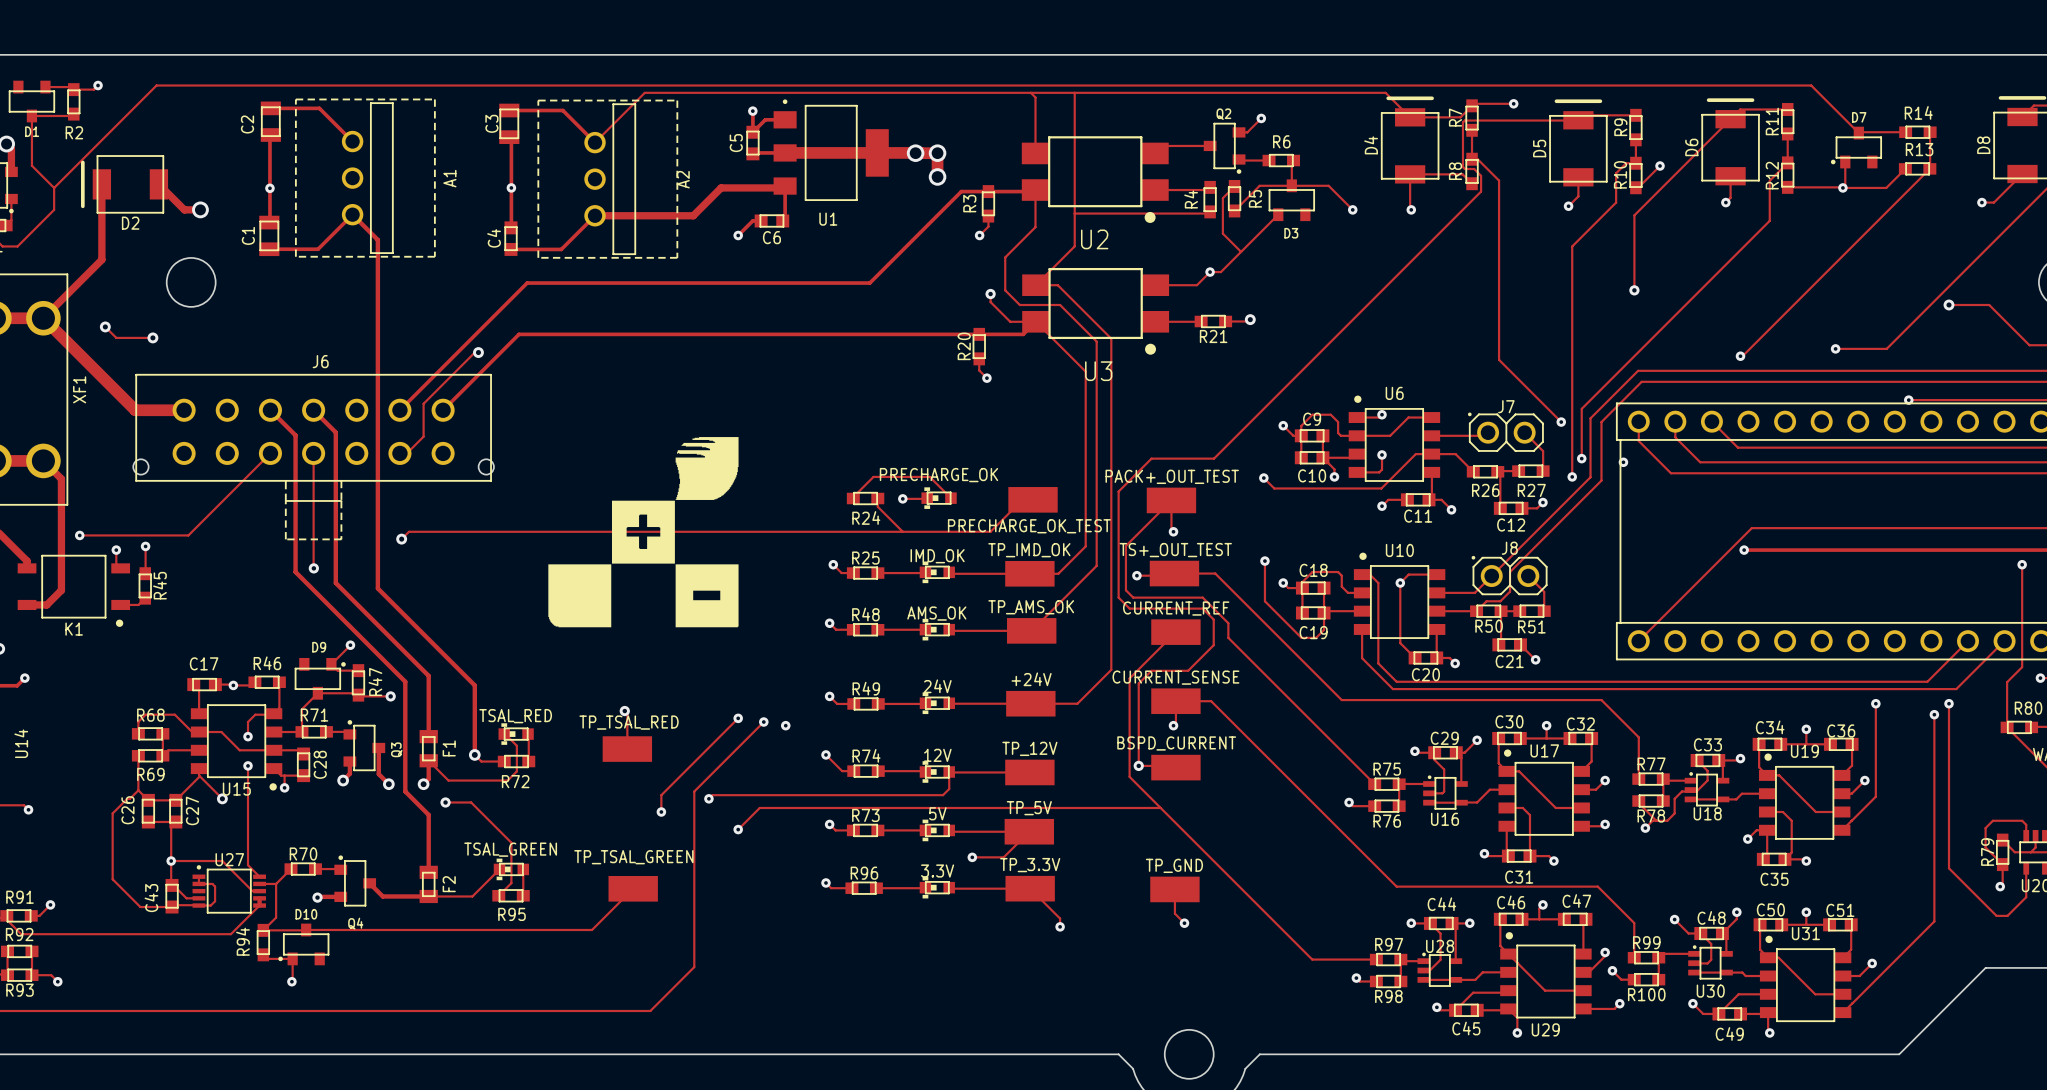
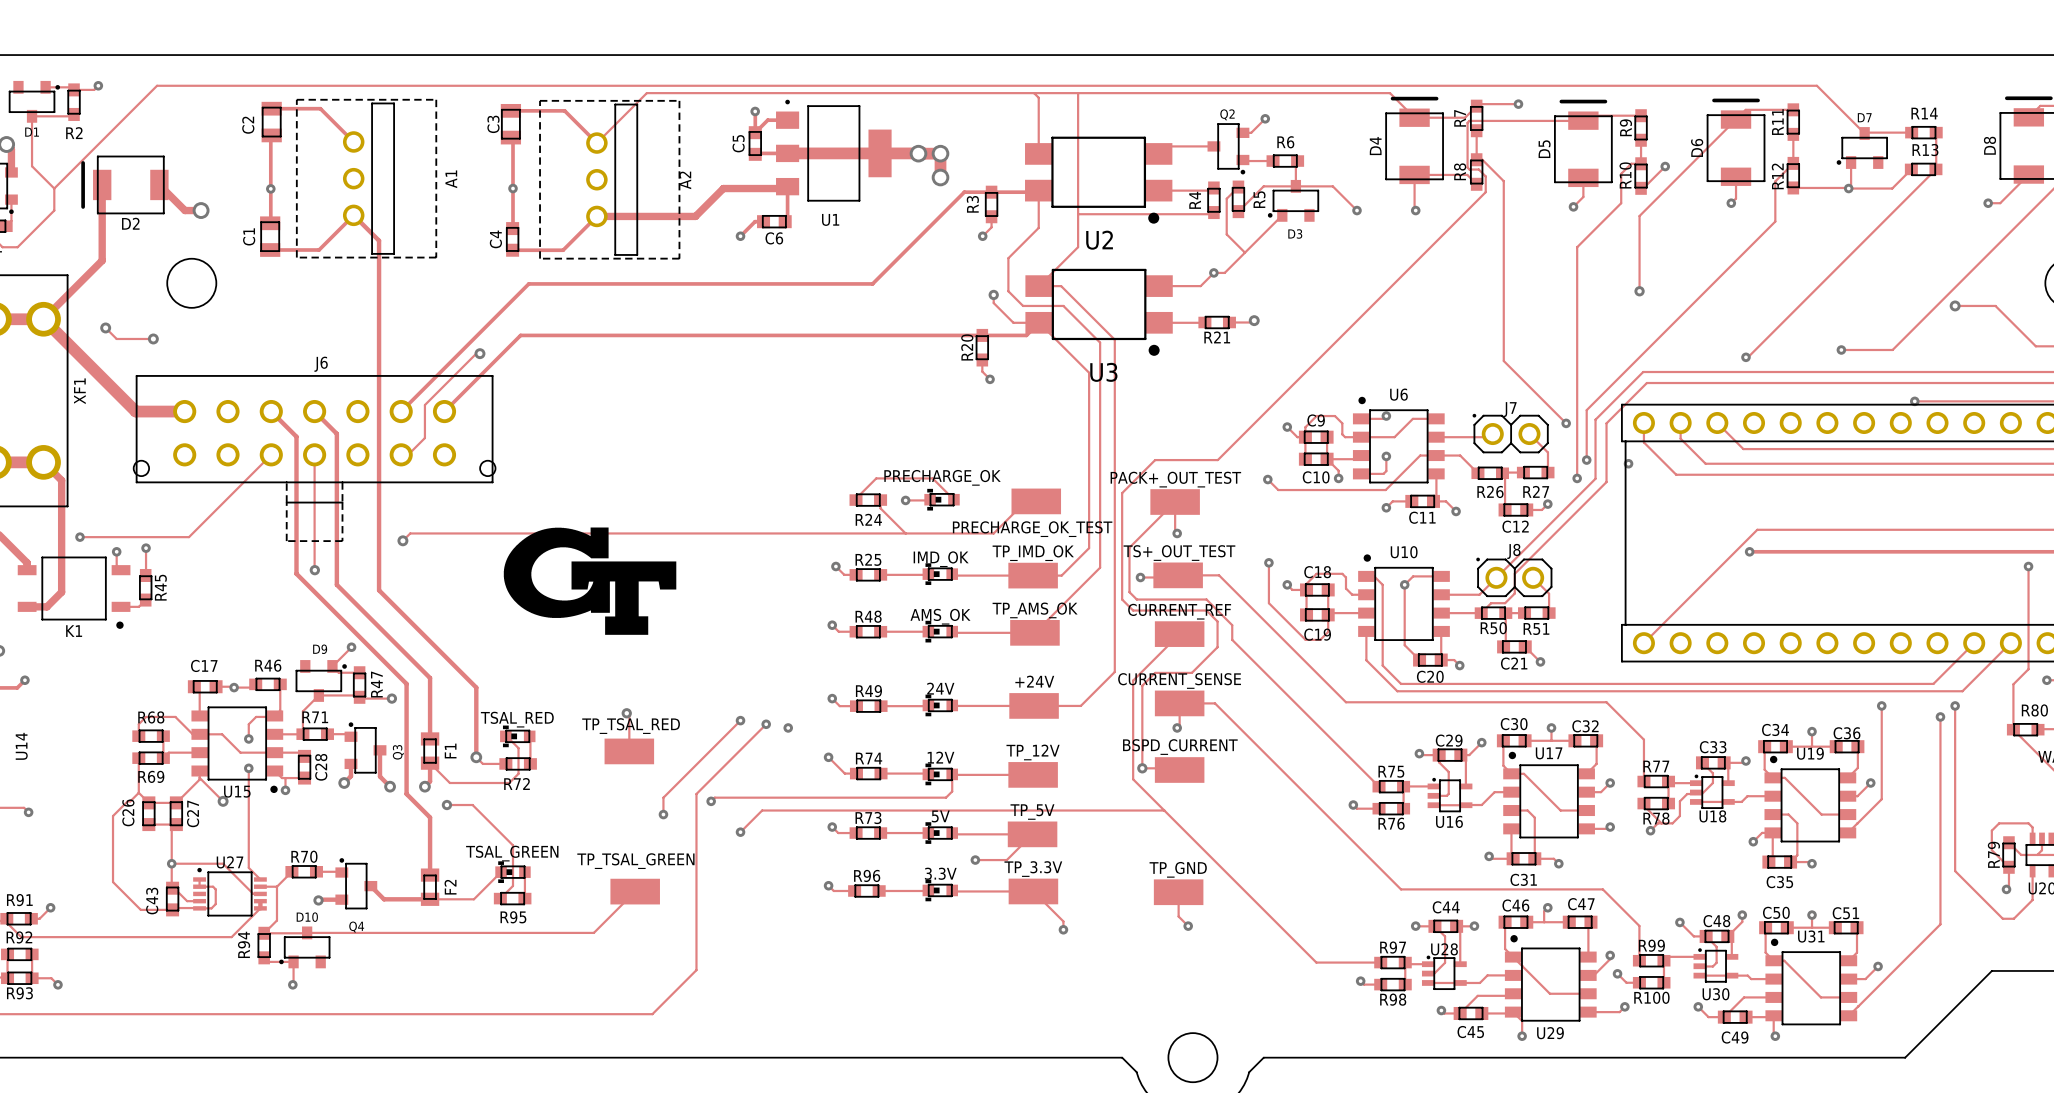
D1 footprint: [8, 80, 56, 123] -> [8, 80, 61, 123]
D3 footprint: [1268, 179, 1316, 222] -> [1267, 179, 1320, 222]
drawing: [548, 437, 739, 628] -> none
drawing: none -> [503, 527, 677, 635]

